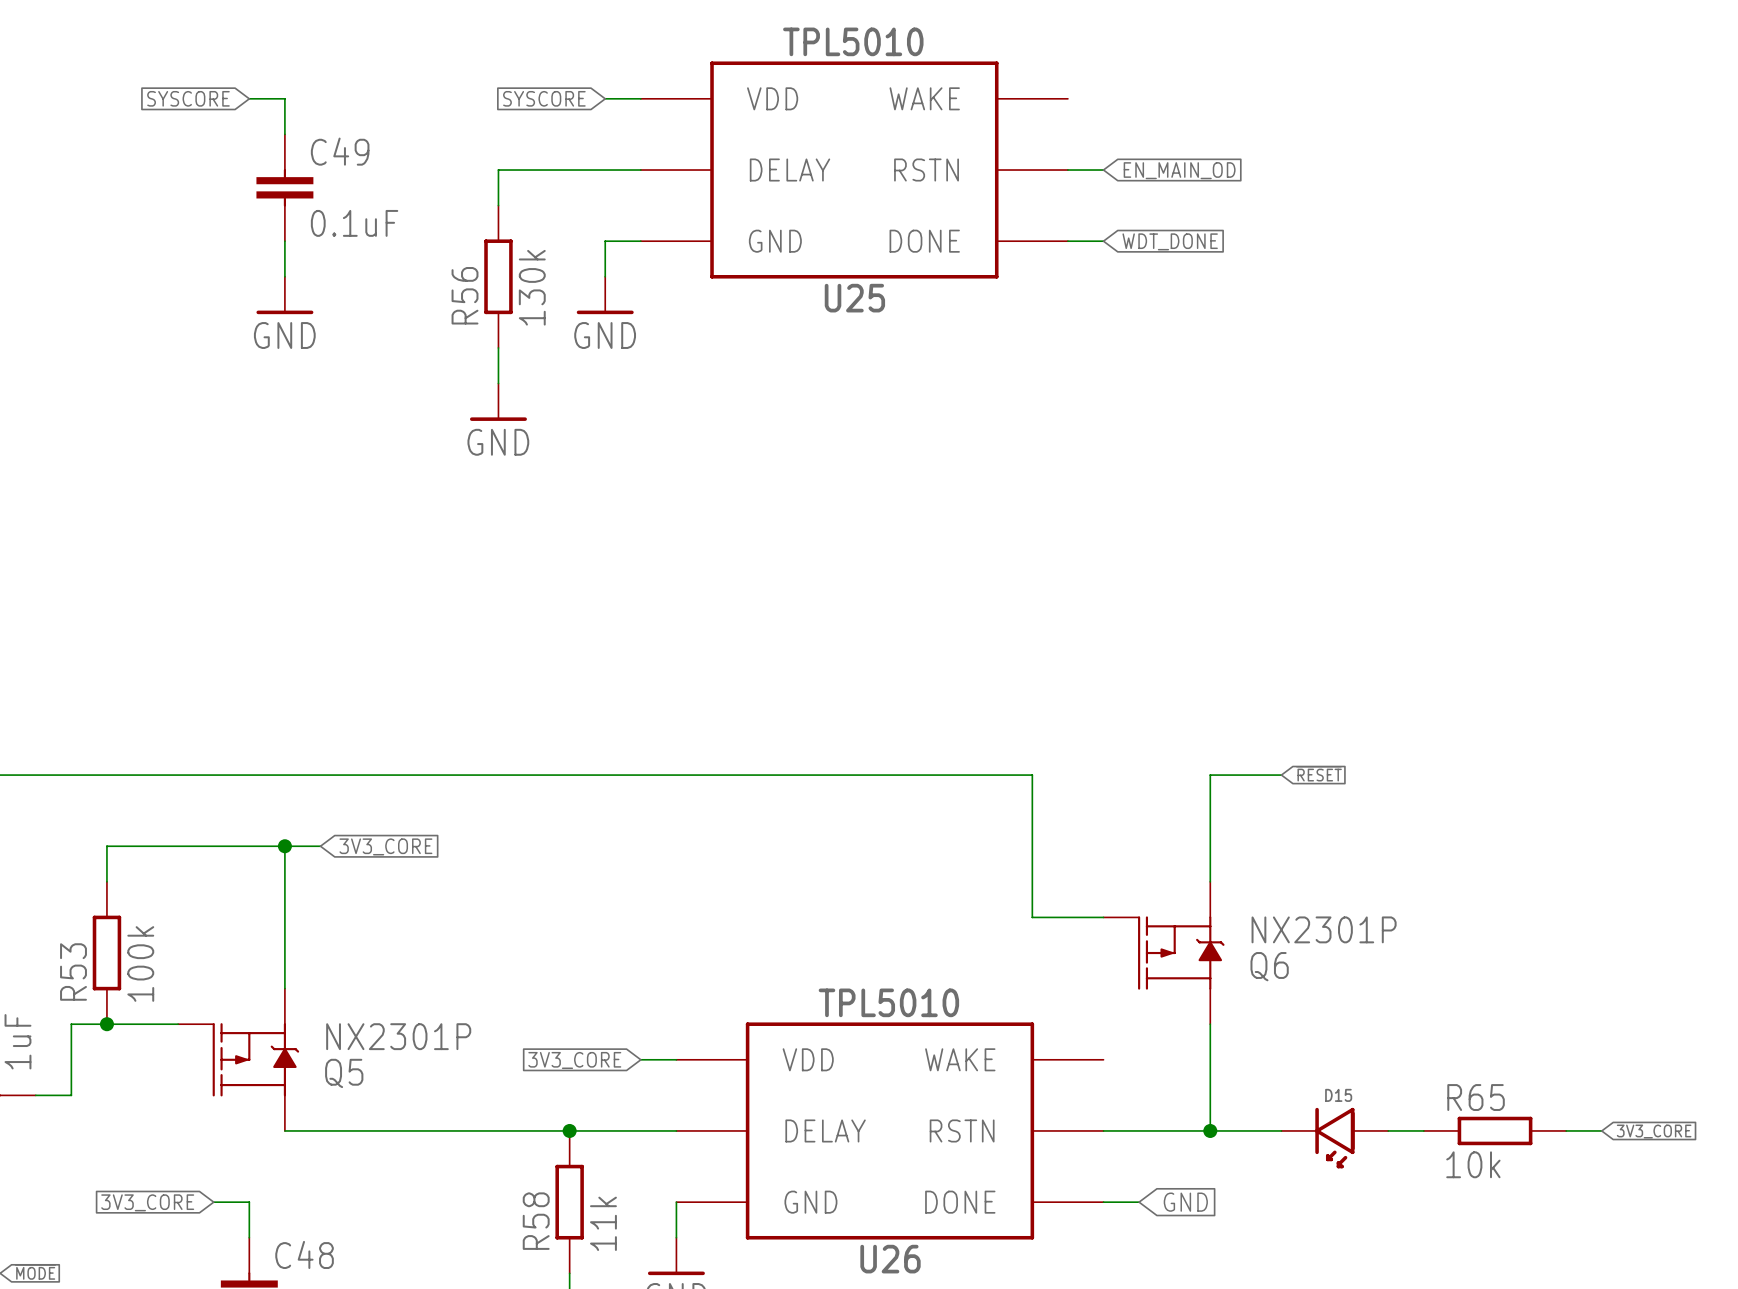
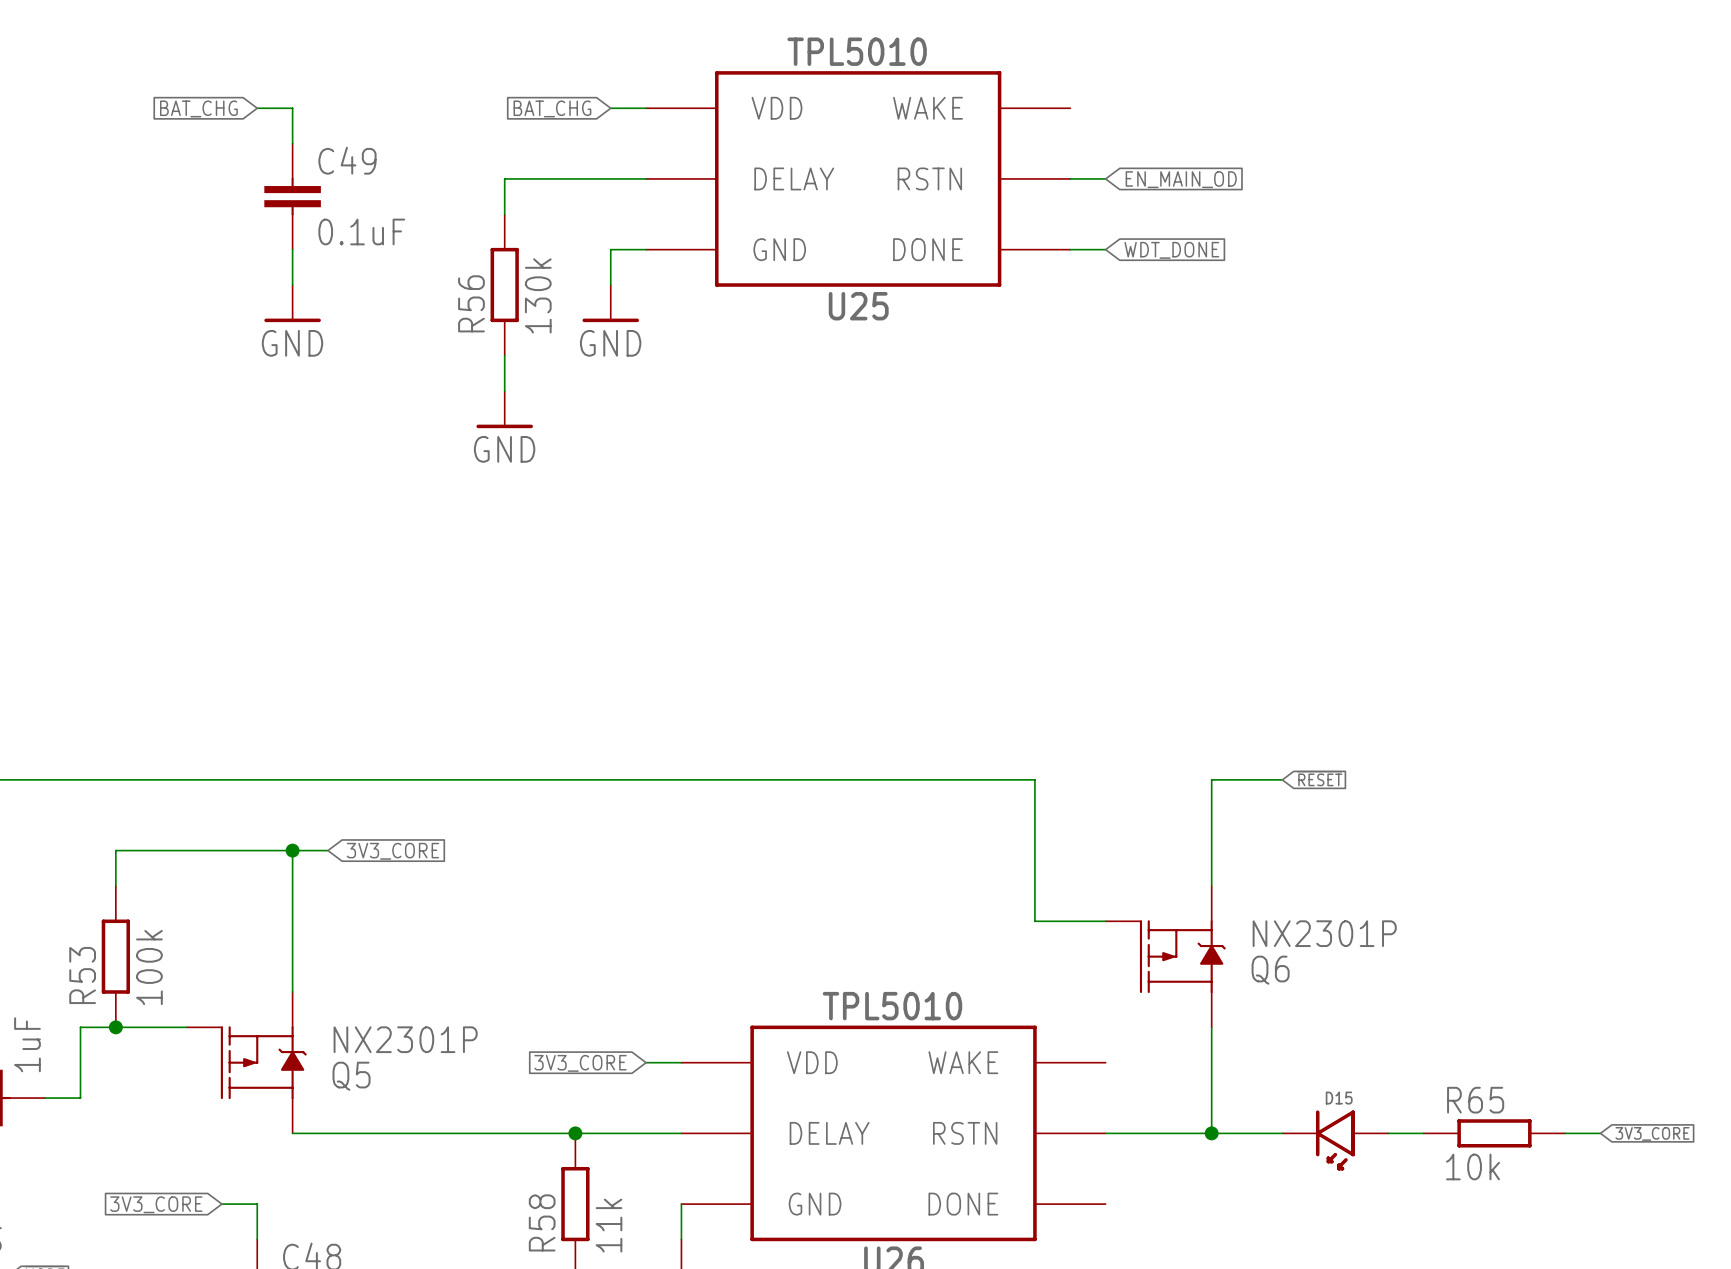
global label: SYSCORE (188, 98) -> BAT_CHG (198, 108)
global label: SYSCORE (544, 98) -> BAT_CHG (552, 108)
wire: (1103, 1202) (1139, 1202) -> none
global label: GND (1185, 1202) -> none

